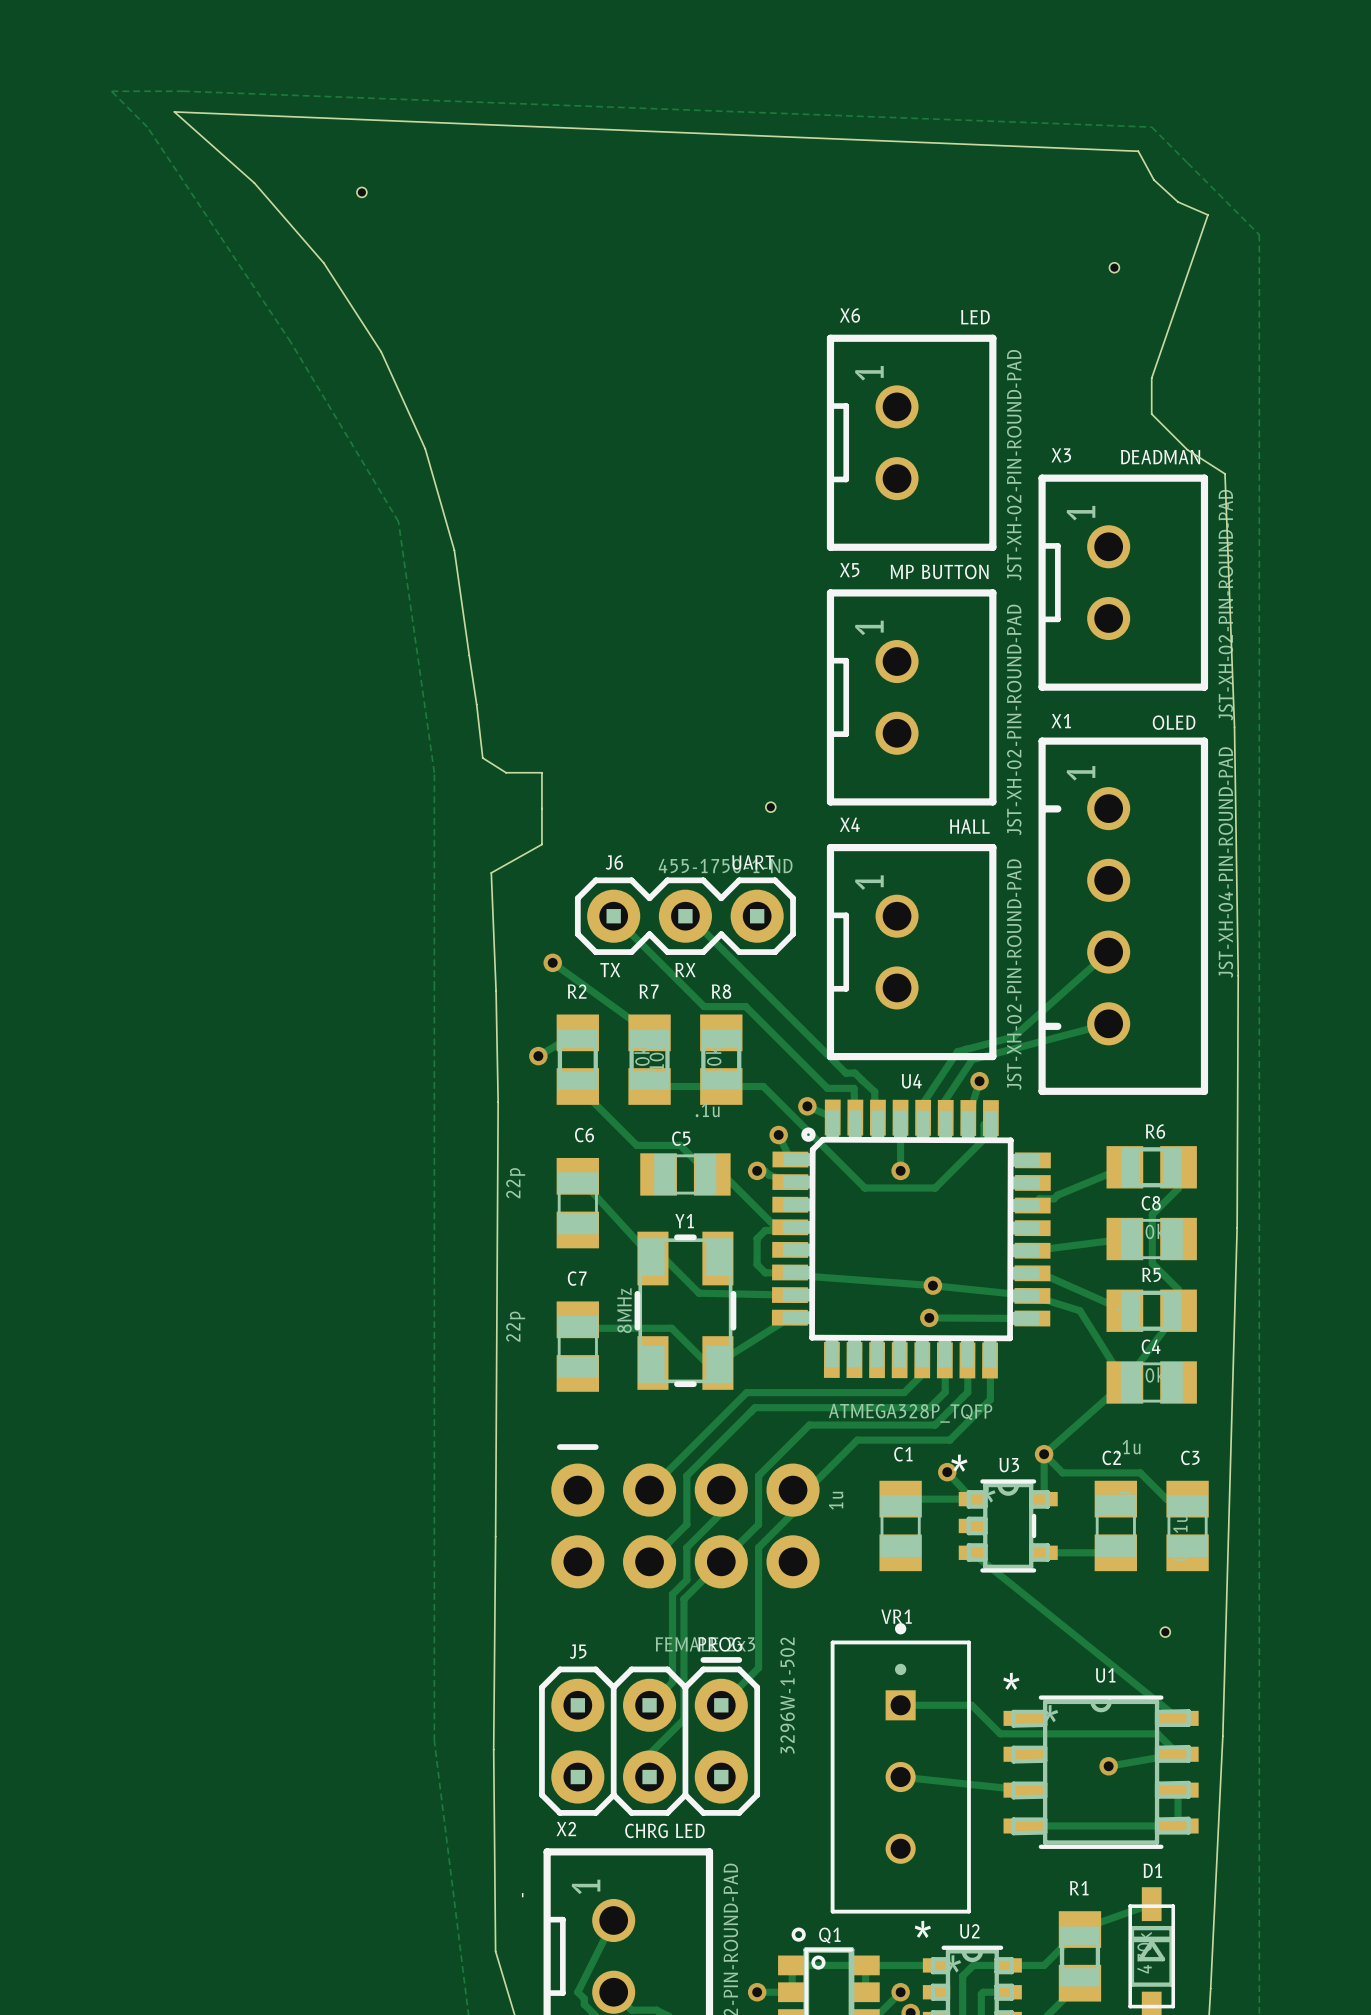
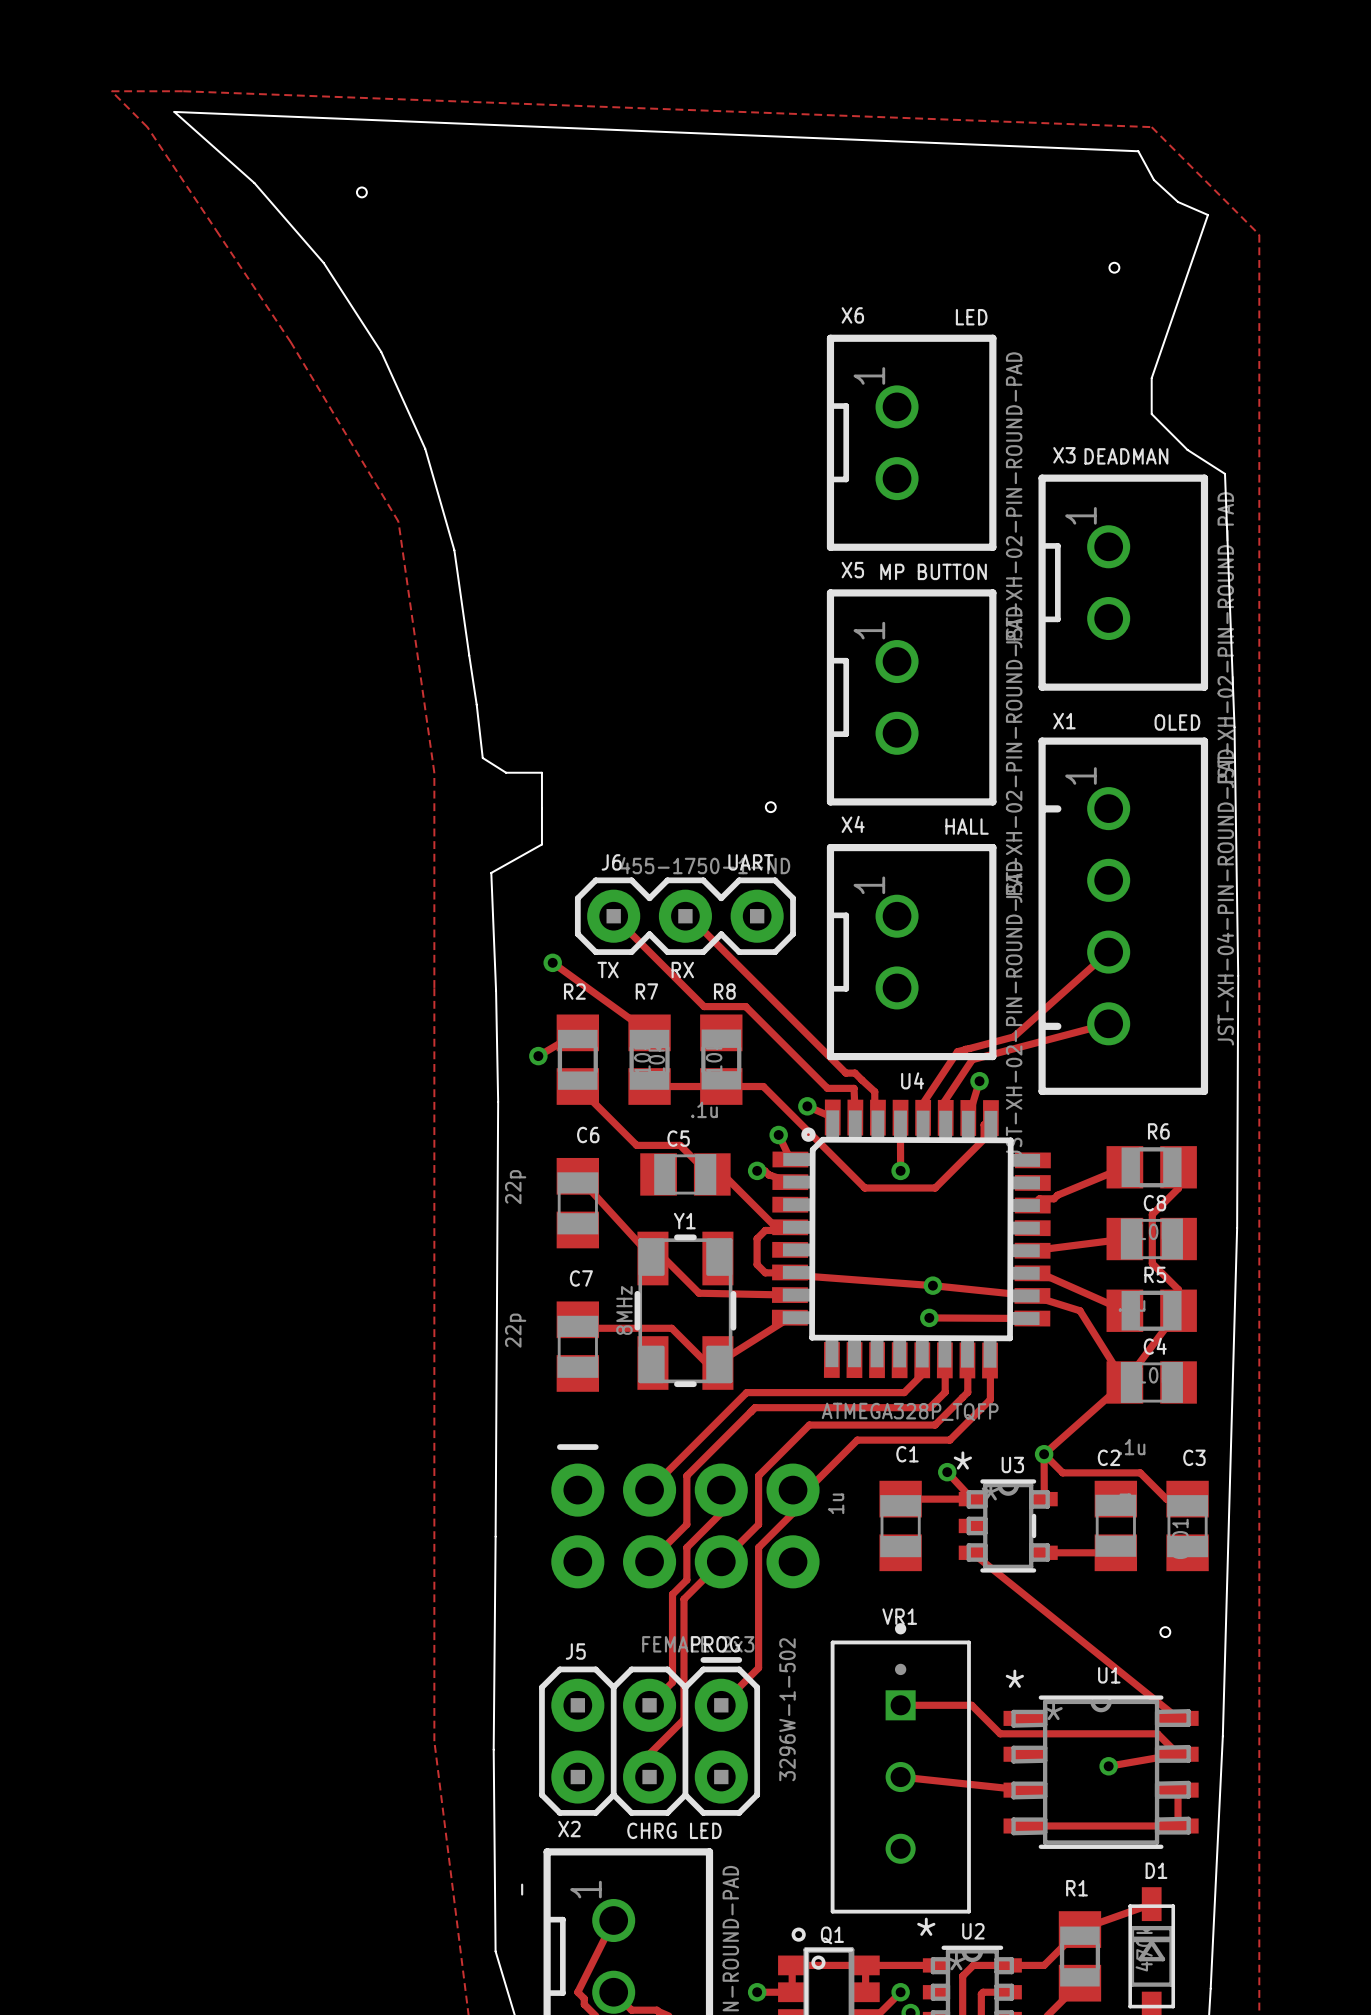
text position: DEADMAN (1160, 457) -> DEADMAN (1126, 456)

